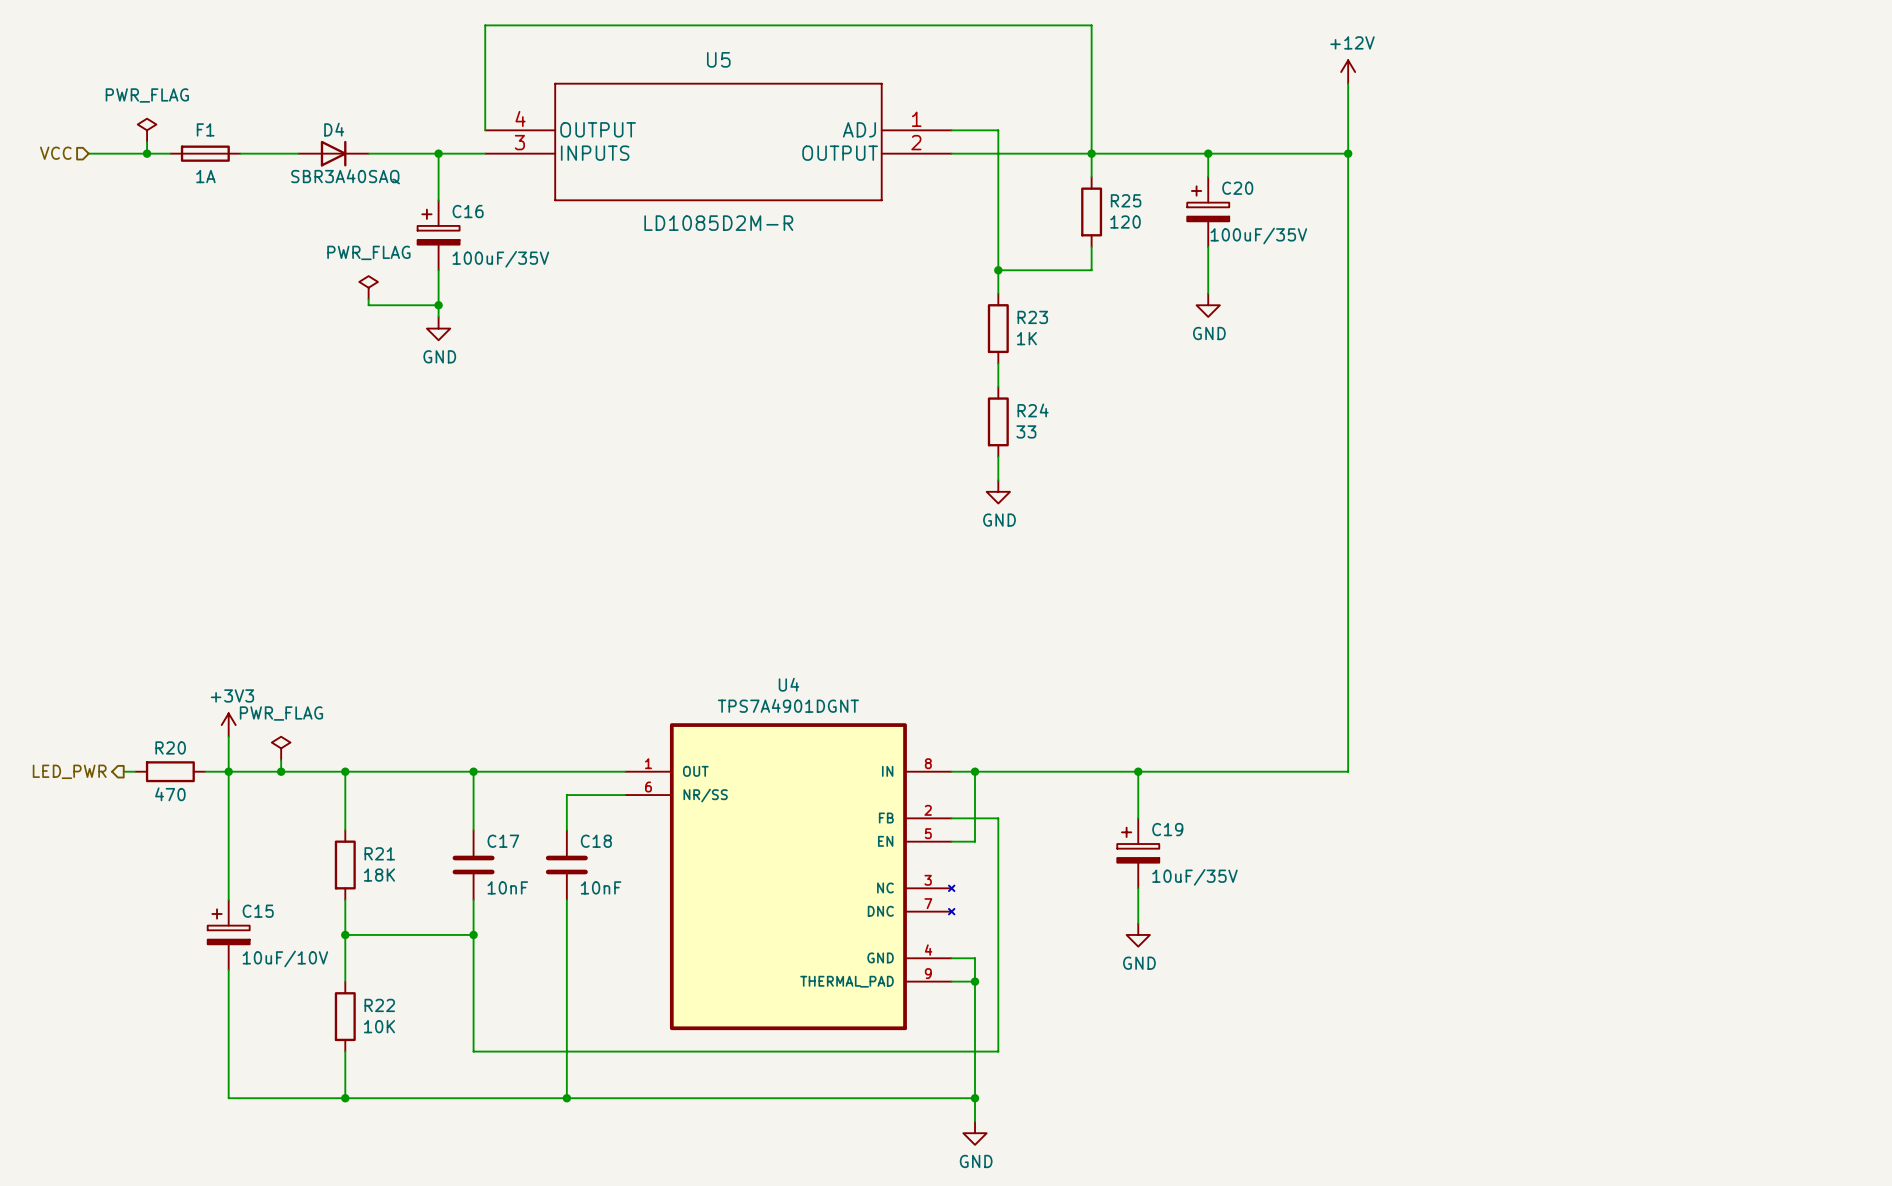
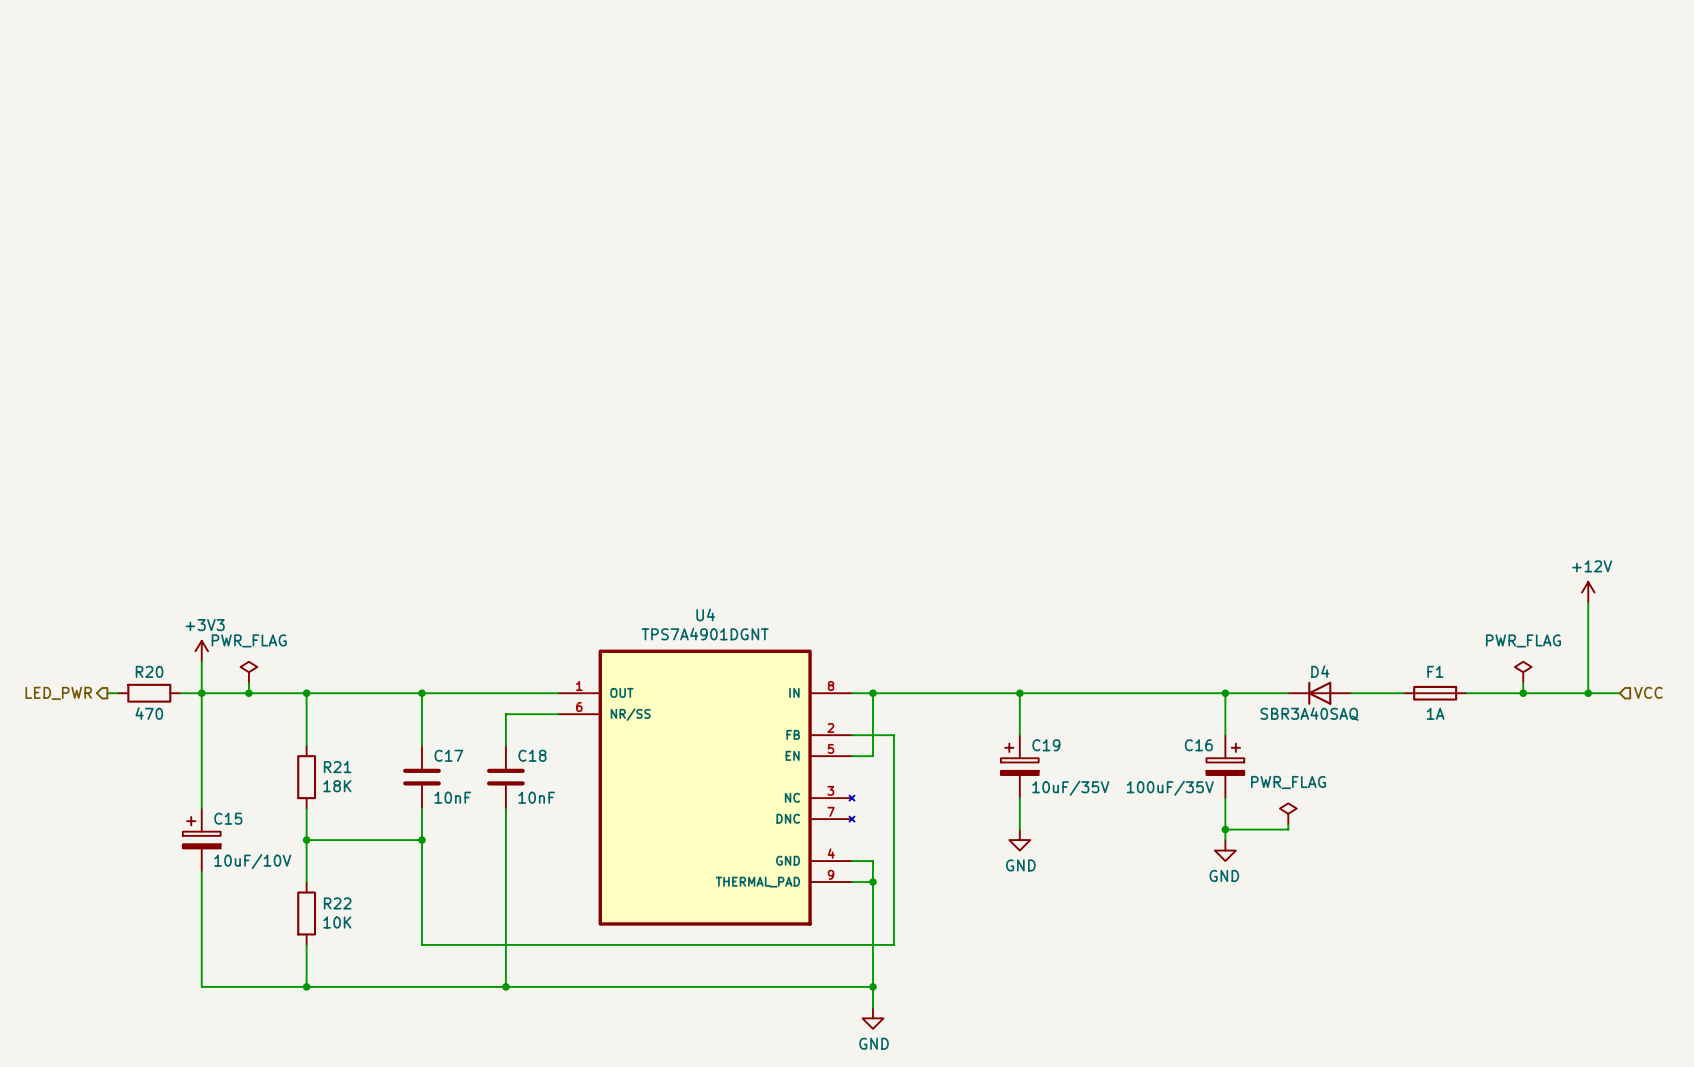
power symbol: +12V (1348, 72) -> none
wire: (1348, 83) (1348, 771) -> (1288, 693) (1208, 693)
power symbol: PWR_FLAG (147, 130) -> none
wire: (485, 130) (485, 25) (1091, 25) (1091, 176) -> none
wire: (951, 130) (998, 130) (998, 293) -> none
wire: (147, 142) (147, 153) -> none
U5: LD1085D2M-R (718, 142) -> none
hierarchical label: VCC (55, 153) -> none
wire: (88, 153) (170, 153) -> none
junction: (147, 153) -> none
F1 position: (205, 153) -> (1435, 693)
wire: (240, 153) (298, 153) -> none
D4 rotation: 0° (333, 153) -> 180° (1319, 693)
D4 position: (333, 153) -> (1319, 693)
wire: (368, 153) (485, 153) -> none
wire: (438, 153) (438, 200) -> none
junction: (438, 153) -> none
wire: (951, 153) (1348, 153) -> none
junction: (1091, 153) -> none
wire: (1208, 153) (1208, 176) -> none
junction: (1208, 153) -> none
junction: (1348, 153) -> none
D4 value position: SBR3A40SAQ (345, 176) -> SBR3A40SAQ (1309, 714)
R25: 120 (1091, 211) -> none
C20: 100uF/35V (1208, 211) -> none
C16 flip: as is (438, 227) -> left-right (1225, 759)
C16 position: (438, 235) -> (1225, 766)
wire: (1091, 246) (1091, 270) (998, 270) -> none
wire: (1208, 246) (1208, 293) -> none
wire: (438, 270) (438, 316) -> none
junction: (998, 270) -> none
power symbol: PWR_FLAG (368, 287) -> none
wire: (368, 299) (368, 305) (438, 305) -> none
junction: (438, 305) -> none
power symbol: GND (1208, 305) -> none
power symbol: GND (438, 328) -> none
R23: 1K (998, 328) -> none
wire: (998, 363) (998, 386) -> none
R24: 33 (998, 421) -> none
wire: (998, 456) (998, 480) -> none
power symbol: GND (998, 491) -> none
power symbol: none -> +12V (1588, 592)
wire: none -> (1588, 603) (1588, 693)
power symbol: none -> PWR_FLAG (1523, 672)
wire: none -> (1523, 682) (1523, 693)
wire: none -> (1225, 693) (1225, 735)
junction: none -> (1225, 693)
wire: none -> (1351, 693) (1403, 693)
wire: none -> (1466, 693) (1619, 693)
junction: none -> (1523, 693)
junction: none -> (1588, 693)
hierarchical label: none -> VCC (1648, 692)
wire: none -> (1225, 798) (1225, 840)
power symbol: none -> PWR_FLAG (1288, 813)
wire: none -> (1288, 824) (1288, 829) (1225, 829)
junction: none -> (1225, 829)
power symbol: none -> GND (1225, 850)

